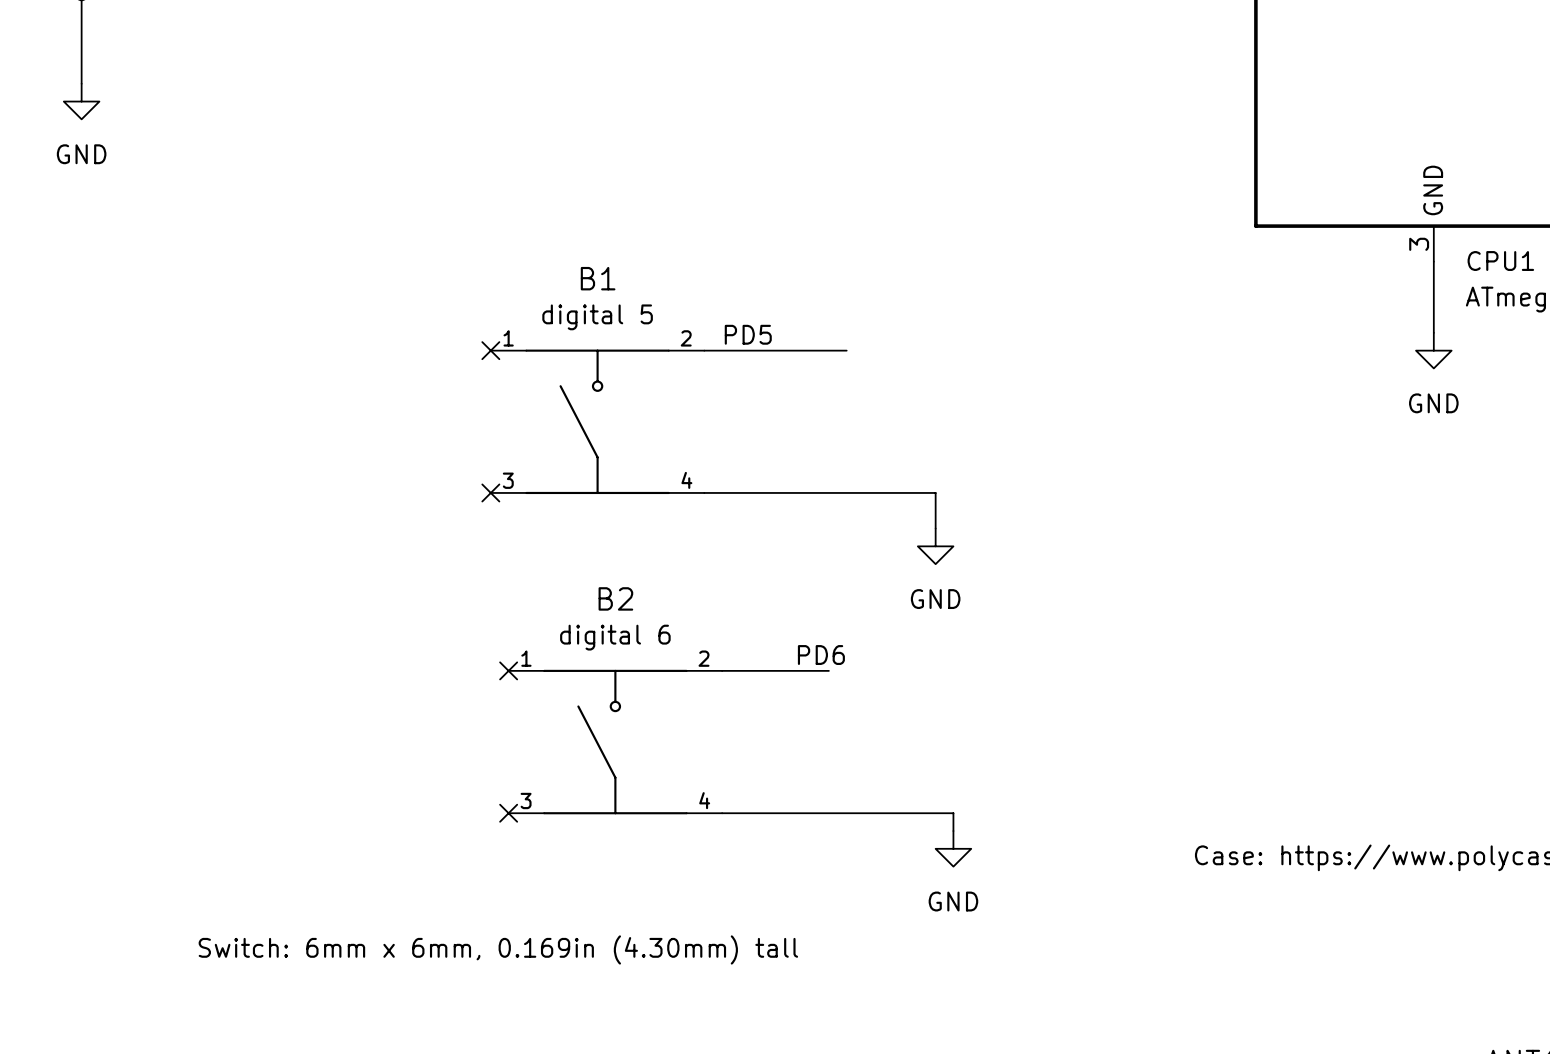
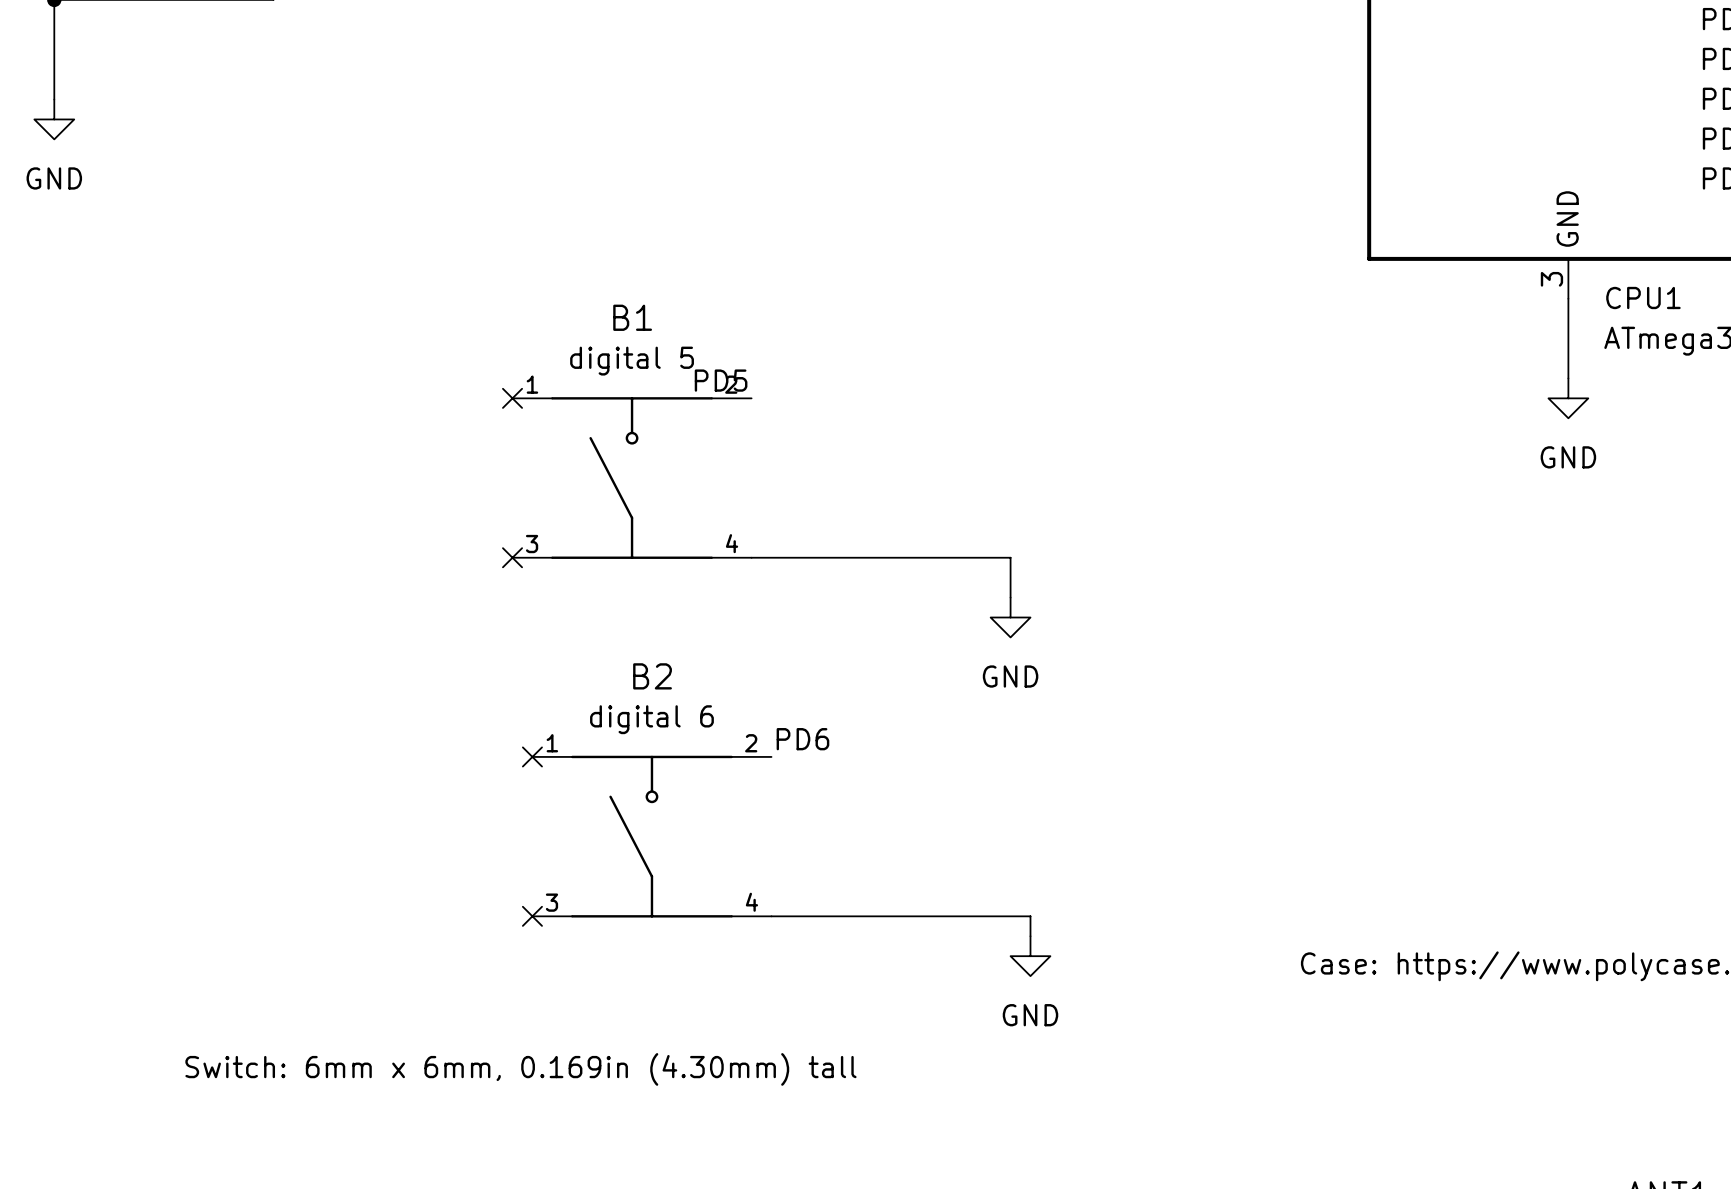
label position: PD5 (748, 334) -> PD5 (721, 380)
wire: (704, 350) (846, 350) -> none
label position: PD6 (821, 655) -> PD6 (802, 739)
wire: (722, 670) (828, 670) -> none

